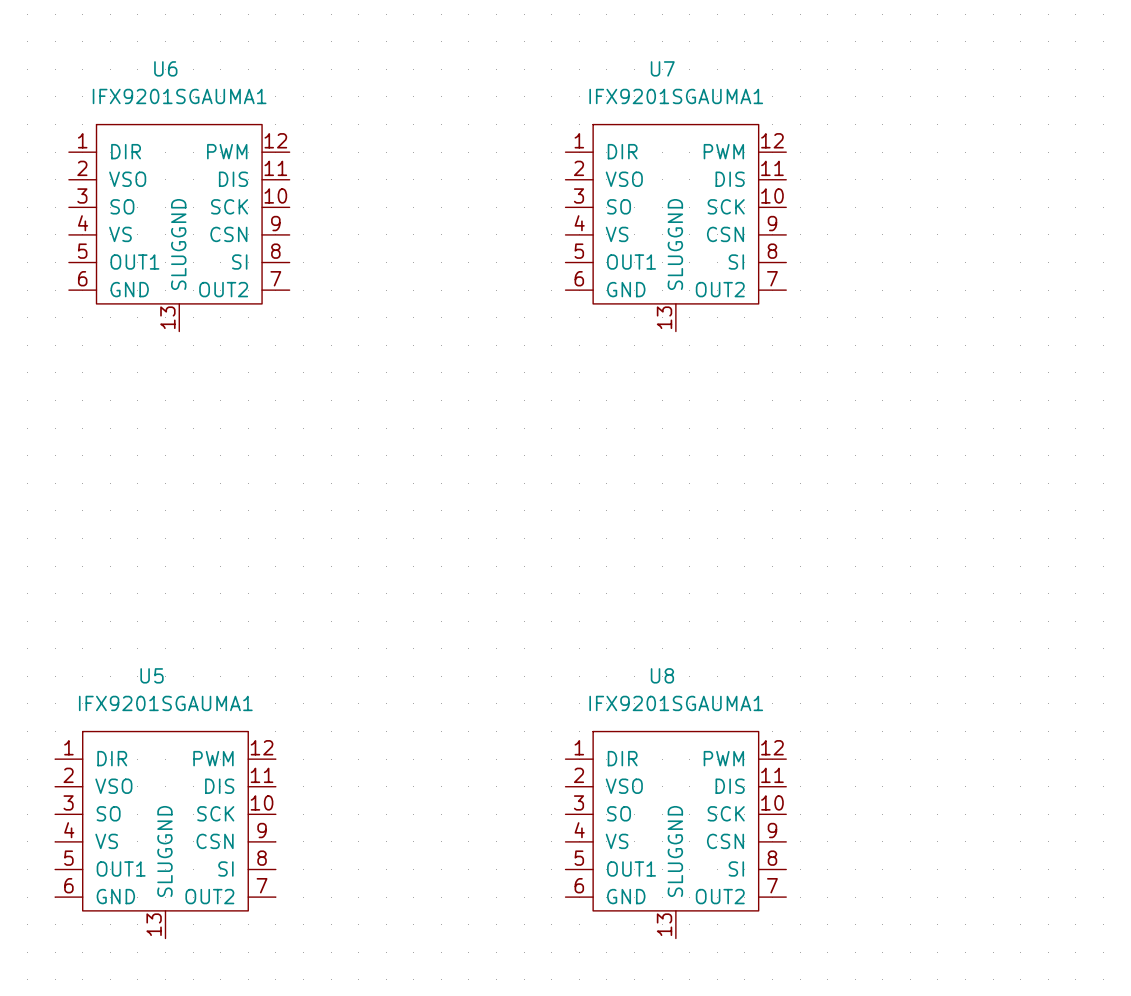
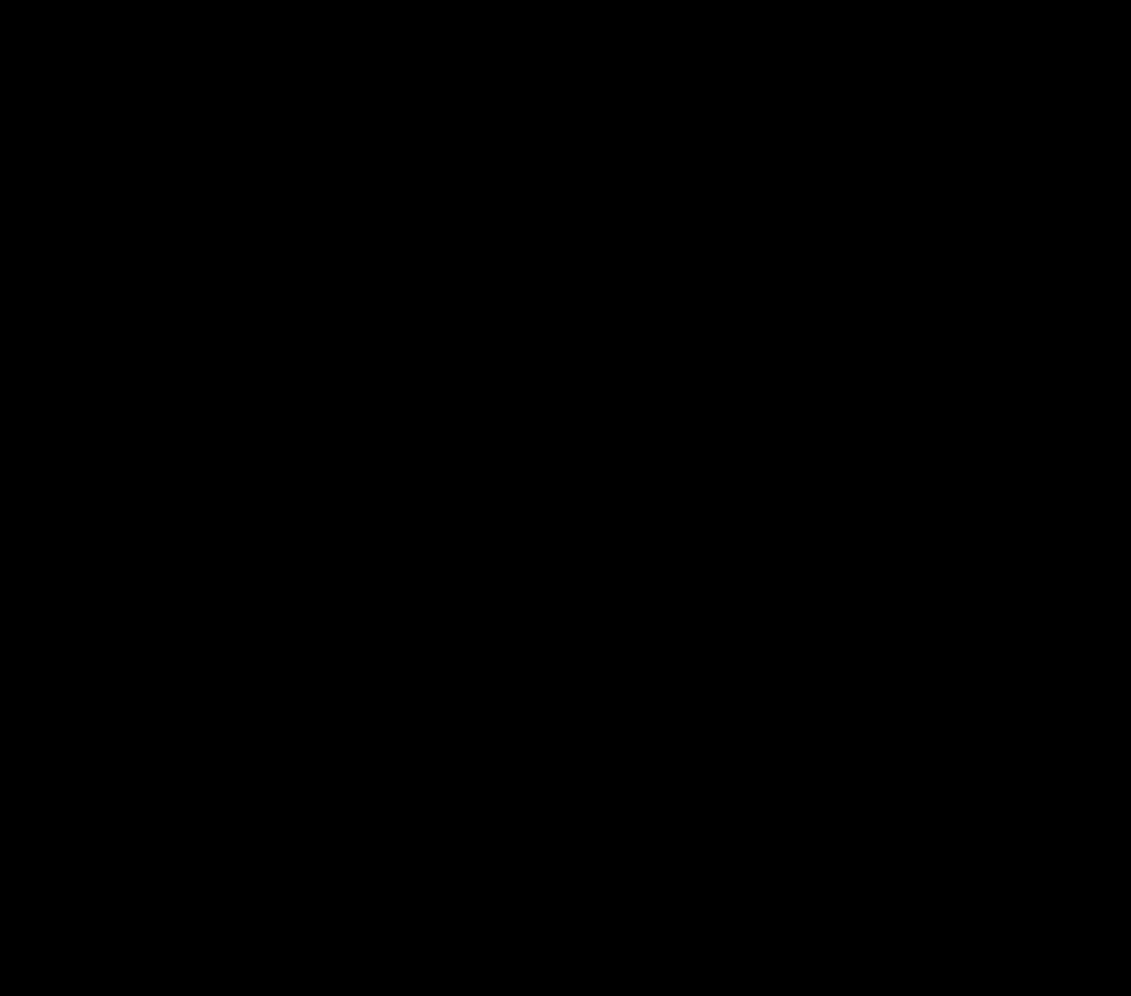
U6: IFX9201SGAUMA1 (324, 193) -> none
U7: IFX9201SGAUMA1 (820, 193) -> none
U5: IFX9201SGAUMA1 (310, 800) -> none
U8: IFX9201SGAUMA1 (820, 800) -> none

